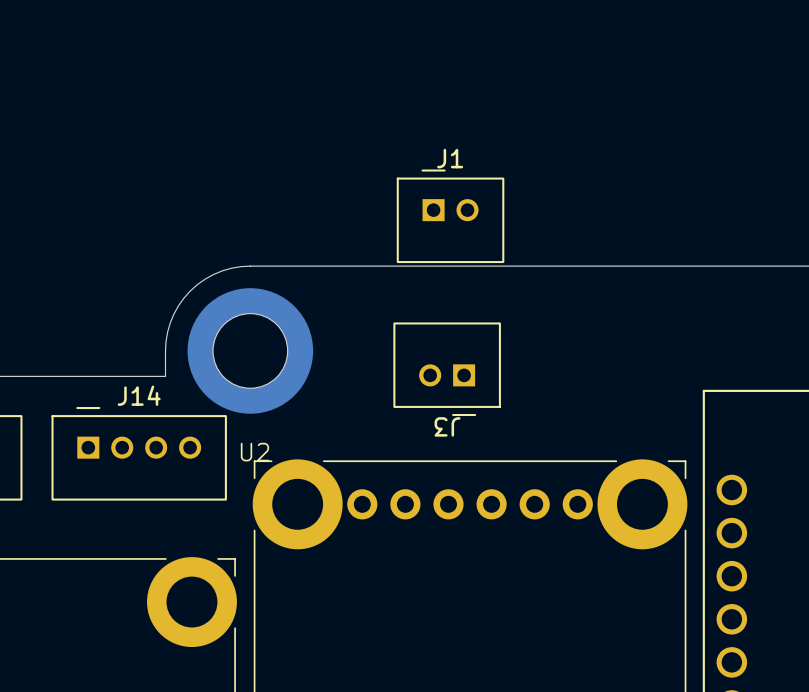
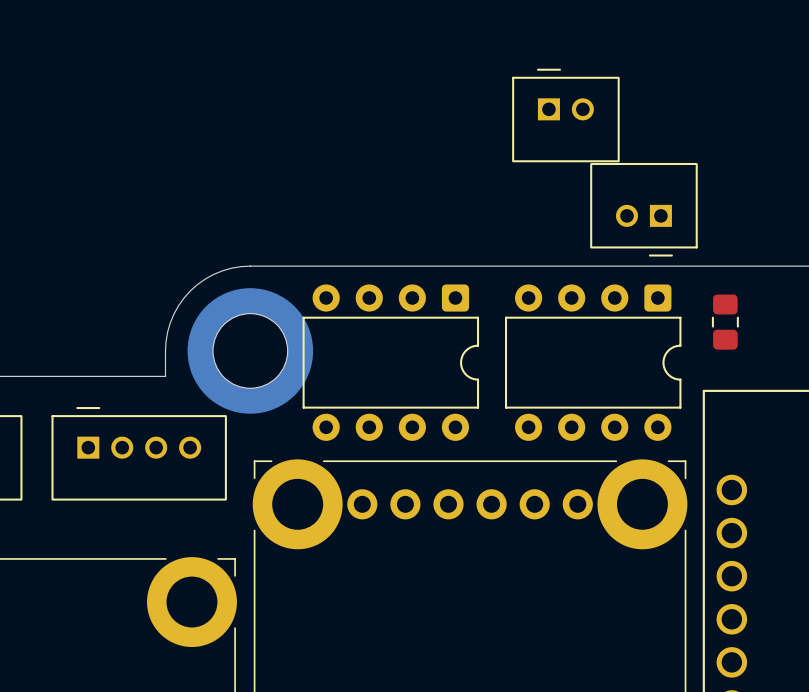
part: none -> (565, 115)
part: none -> (643, 209)
J1: (450, 216) -> none
part: none -> (725, 322)
part: none -> (390, 362)
part: none -> (593, 362)
J3: (447, 369) -> none
J14 name: J14 (139, 395) -> none
U2 name: U2 (254, 452) -> none

